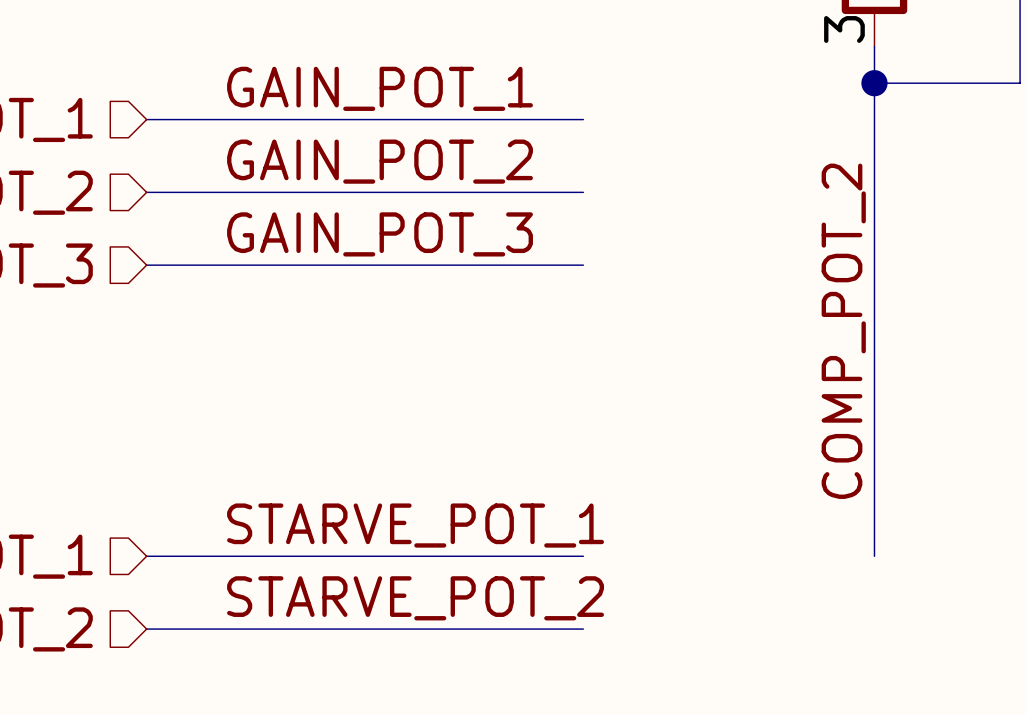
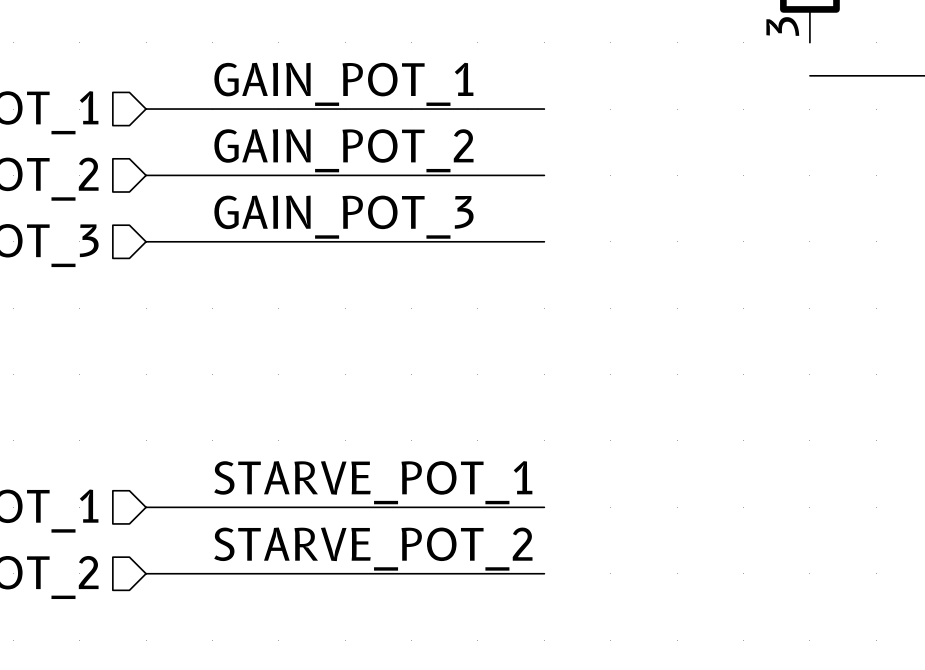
wire: (874, 46) (874, 556) -> none
junction: (874, 83) -> none
label: COMP_POT_2 (843, 331) -> none

